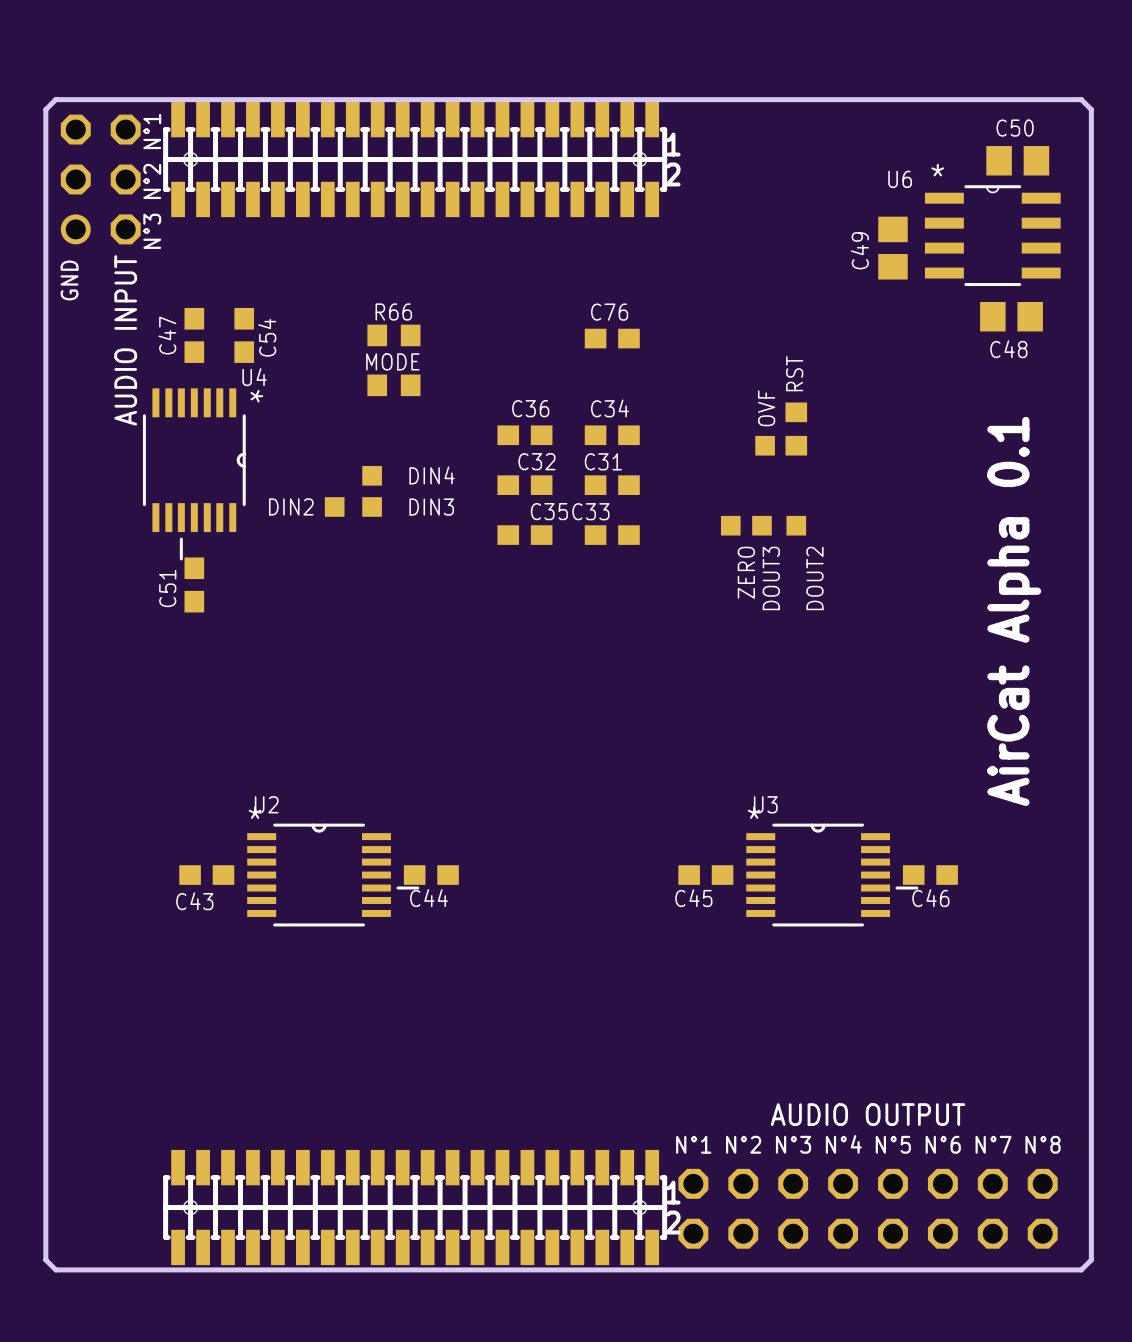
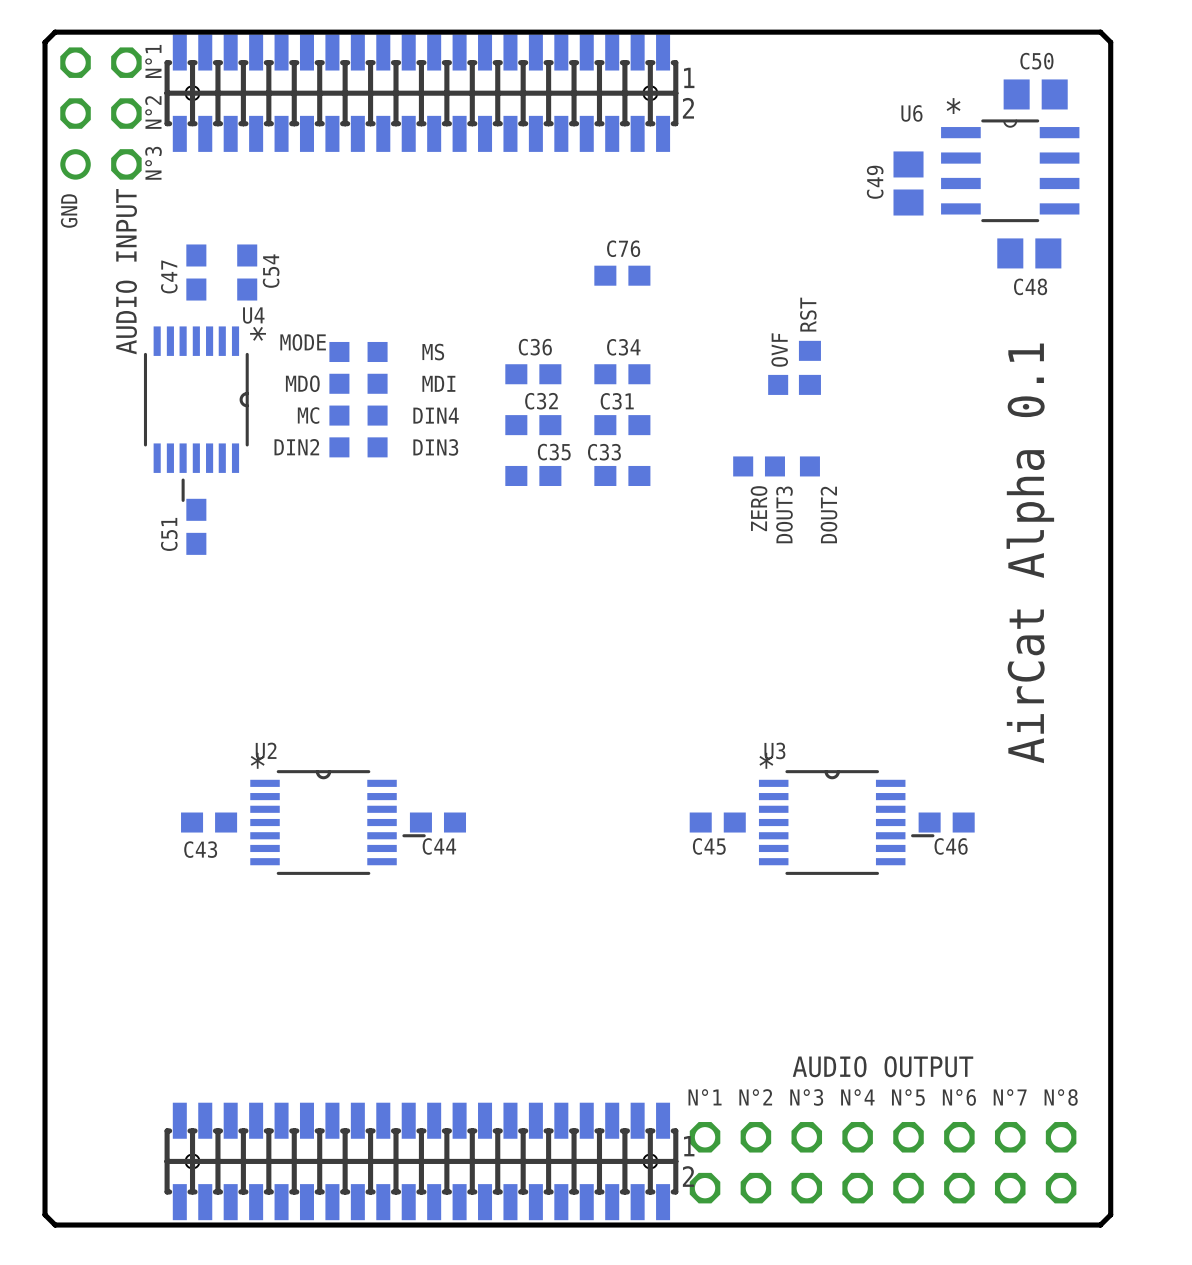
R66: (393, 335) -> none
MODE: (393, 385) -> none
MODE: none -> (339, 351)
MS: none -> (377, 351)
MDO: none -> (339, 383)
MDI: none -> (377, 383)
MC: none -> (339, 415)

